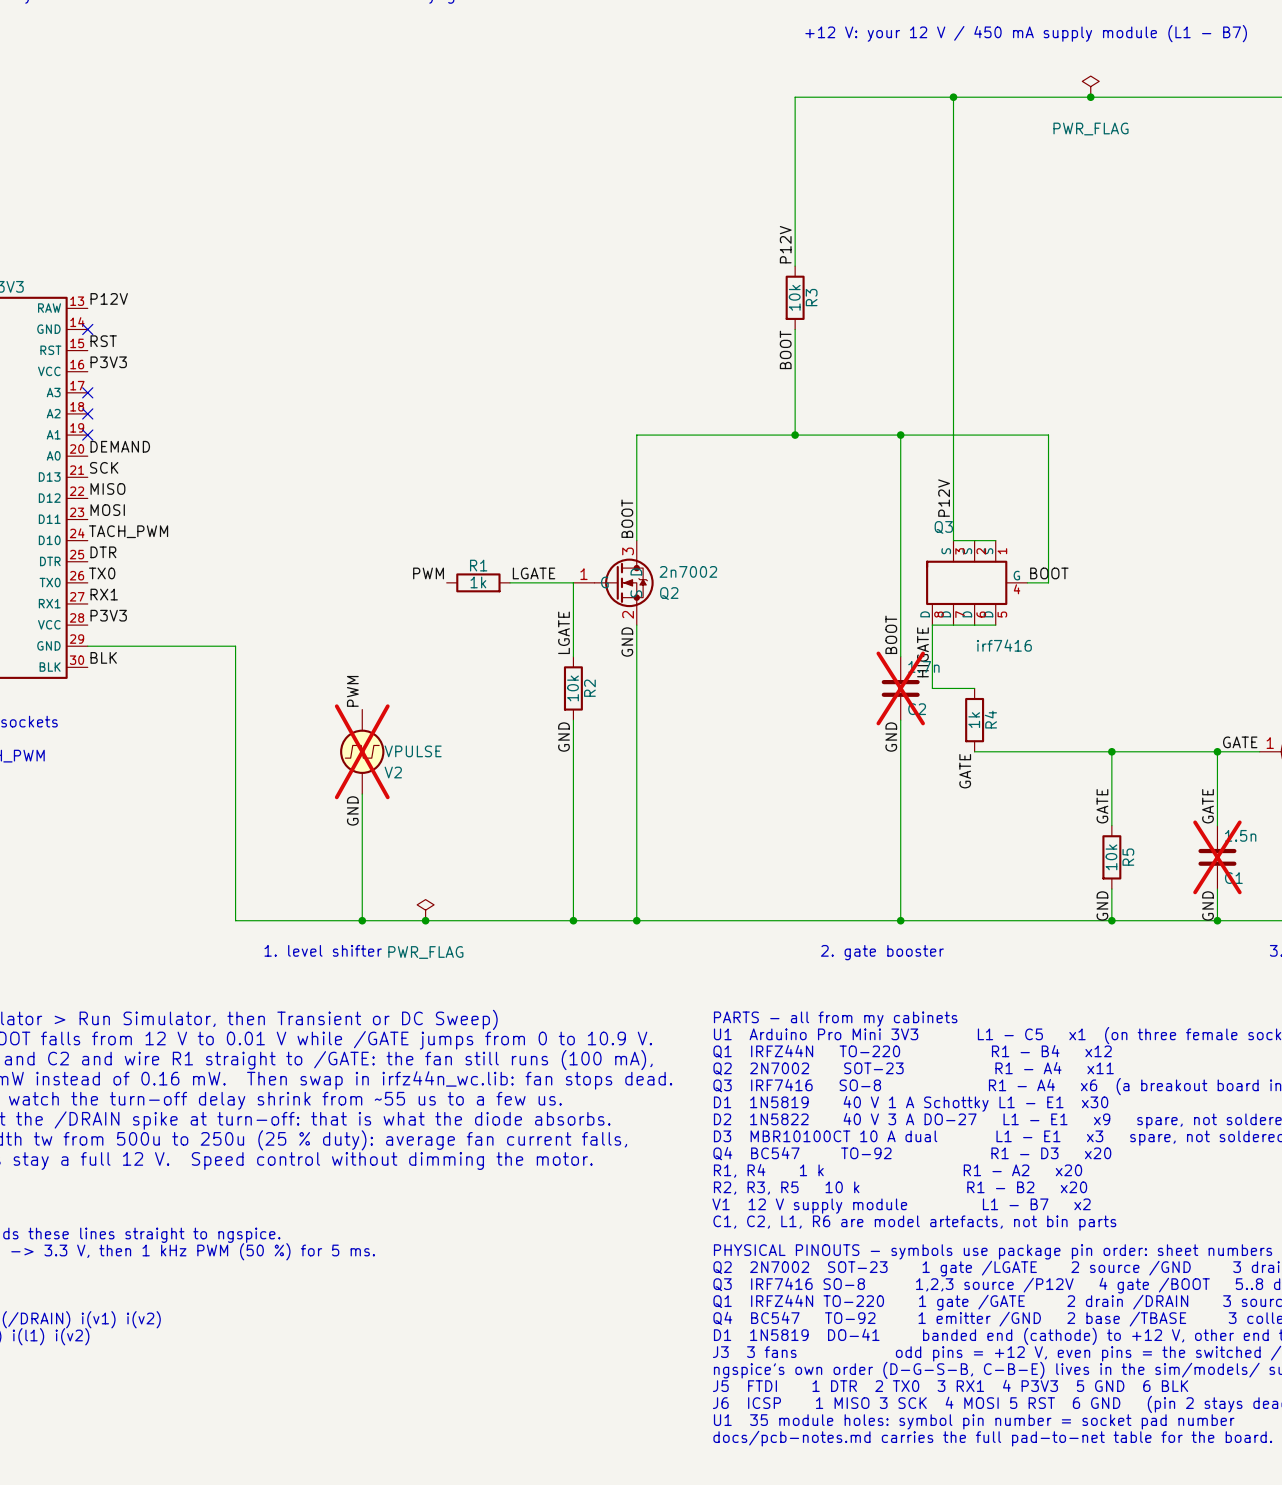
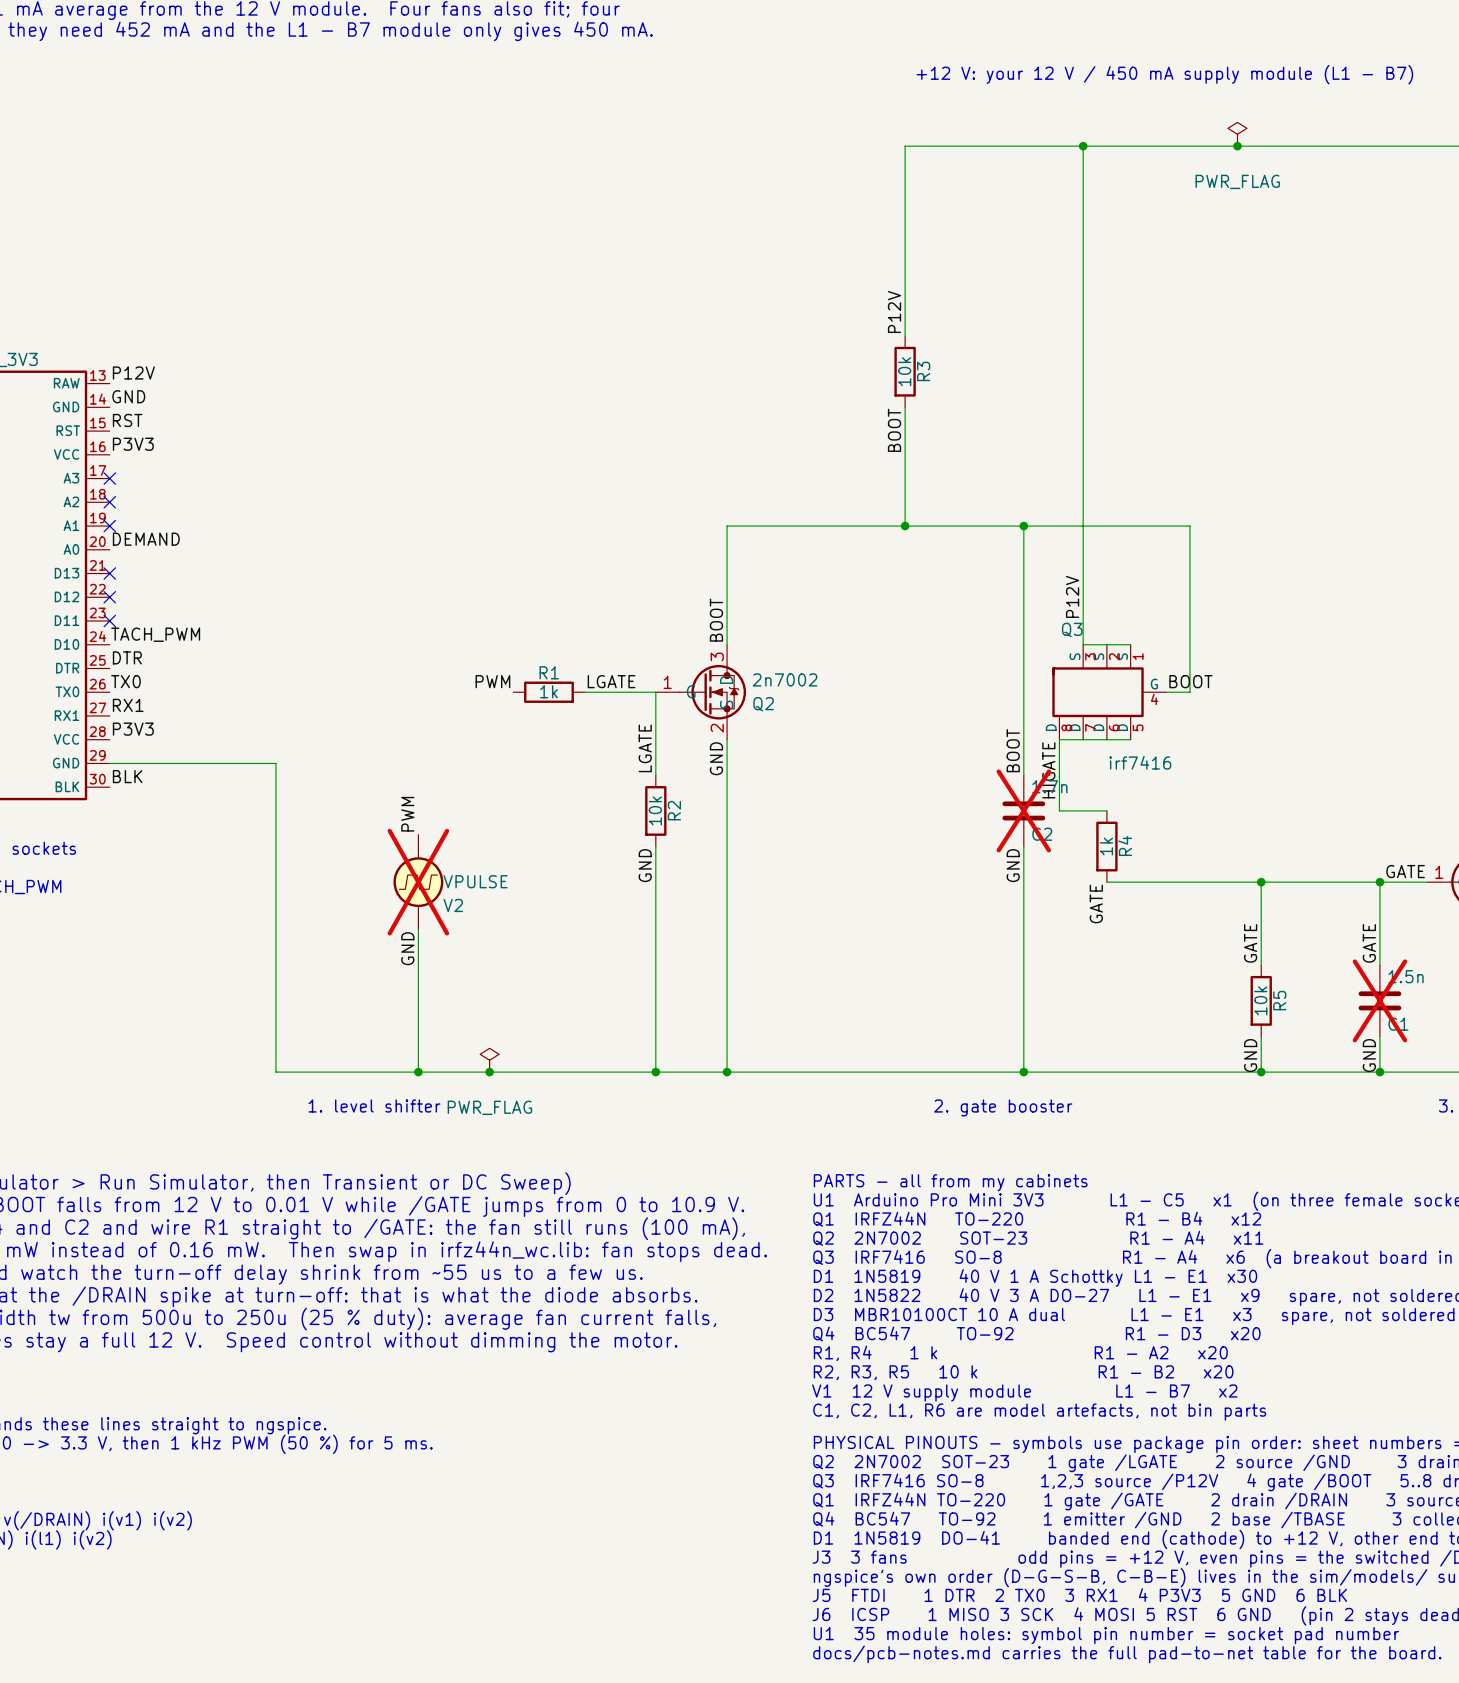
label: none -> GND (128, 396)
no-connect mark: (87, 329) -> none
label: SCK (104, 467) -> none
no-connect mark: none -> (109, 573)
label: MISO (107, 488) -> none
no-connect mark: none -> (109, 597)
label: MOSI (107, 510) -> none
no-connect mark: none -> (109, 621)

